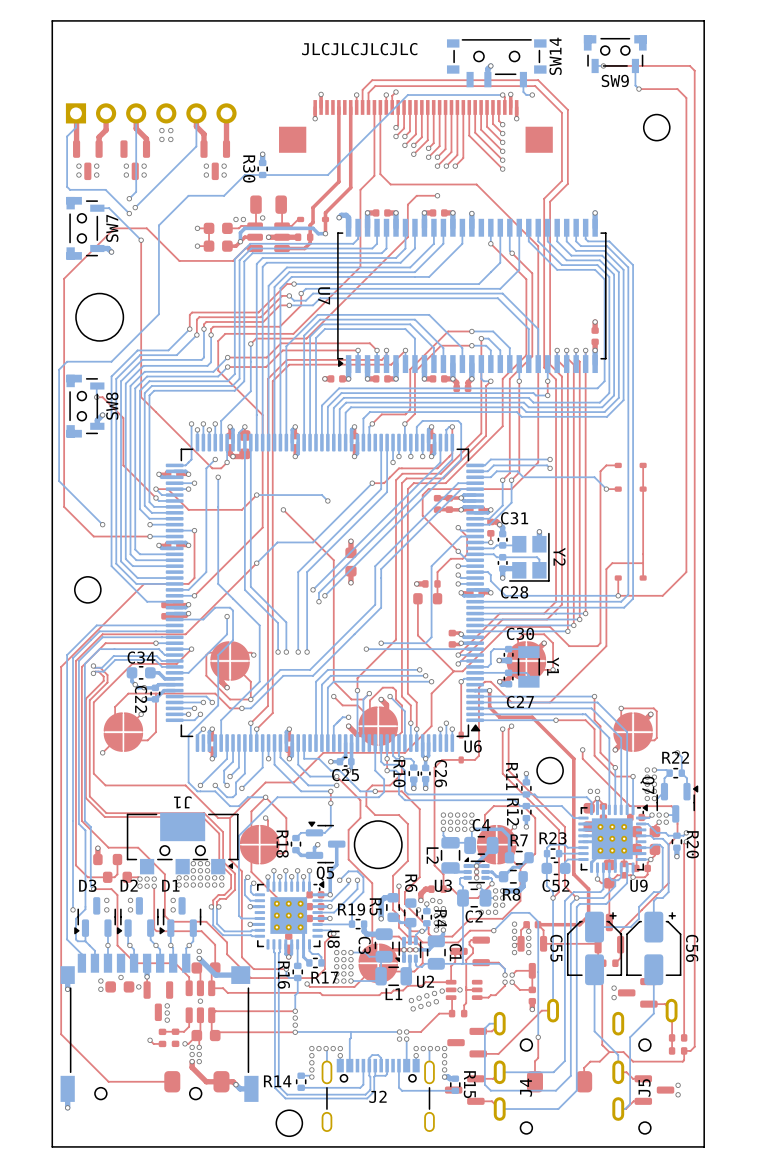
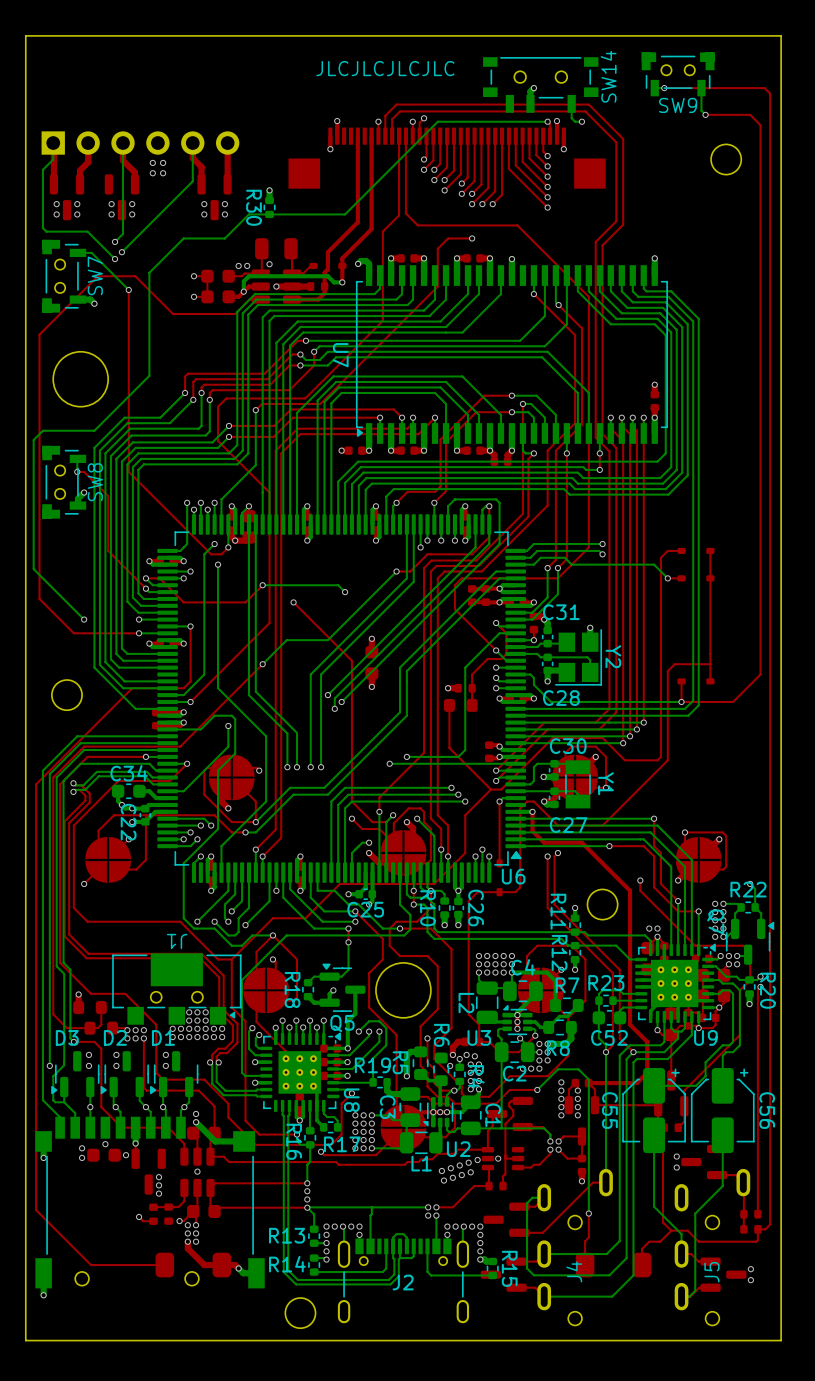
bottom track: none -> (307, 1207) (314, 1214) (314, 1229)
R13: none -> (314, 1236)
bottom track: none -> (326, 1243) (314, 1243)

